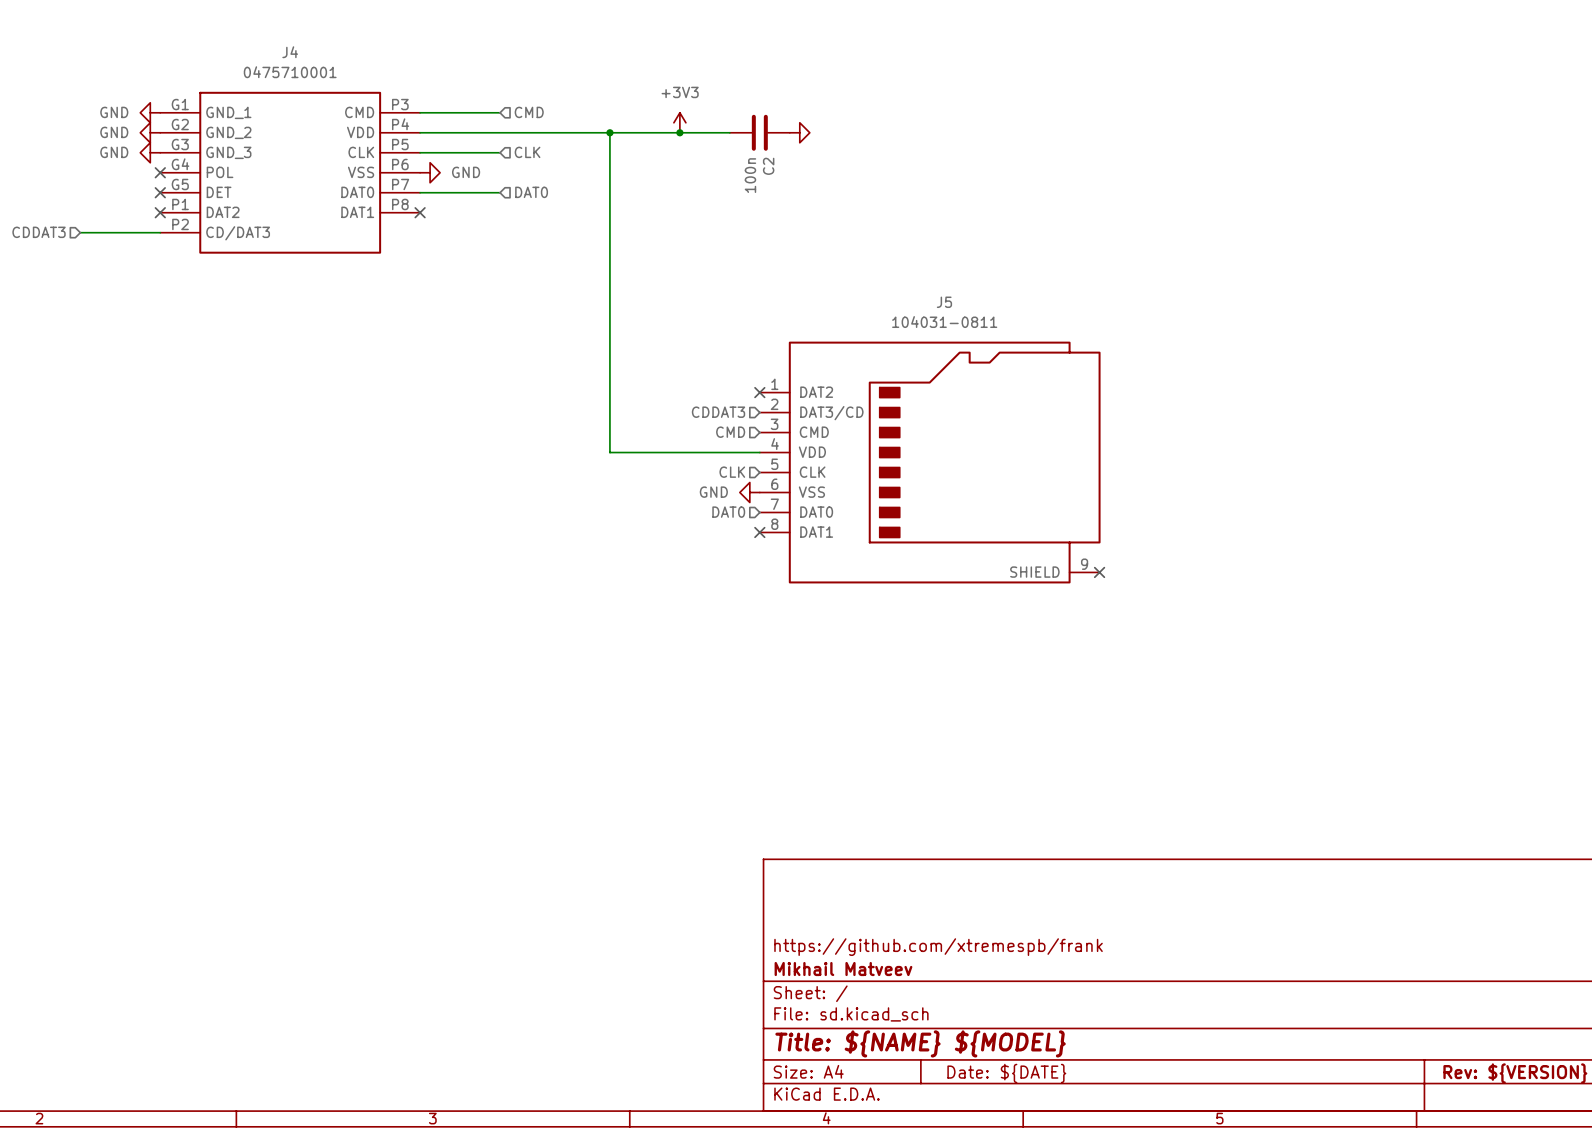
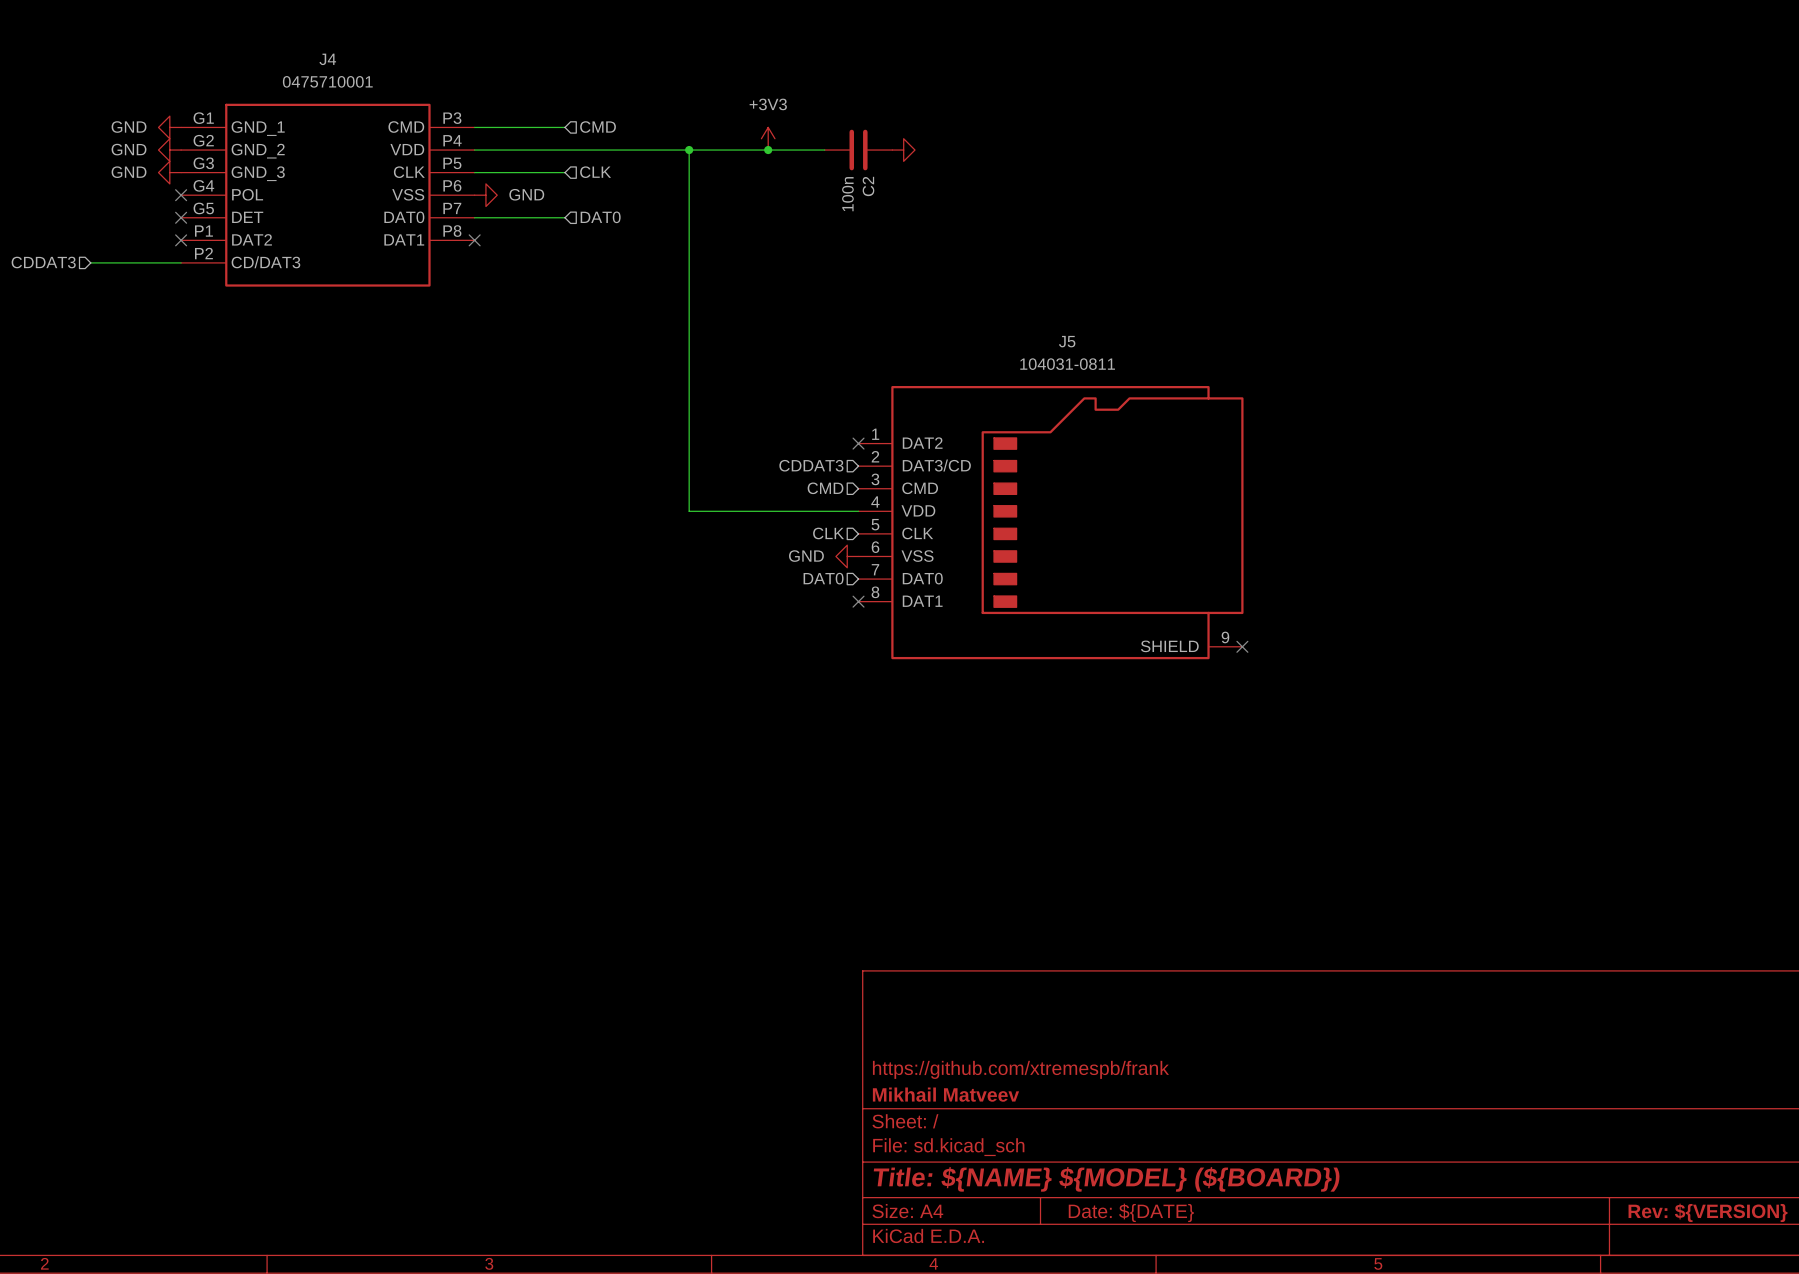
title block: Title: ${NAME} ${MODEL} (920, 1043) -> Title: ${NAME} ${MODEL} (${BOARD}) (1106, 1179)

